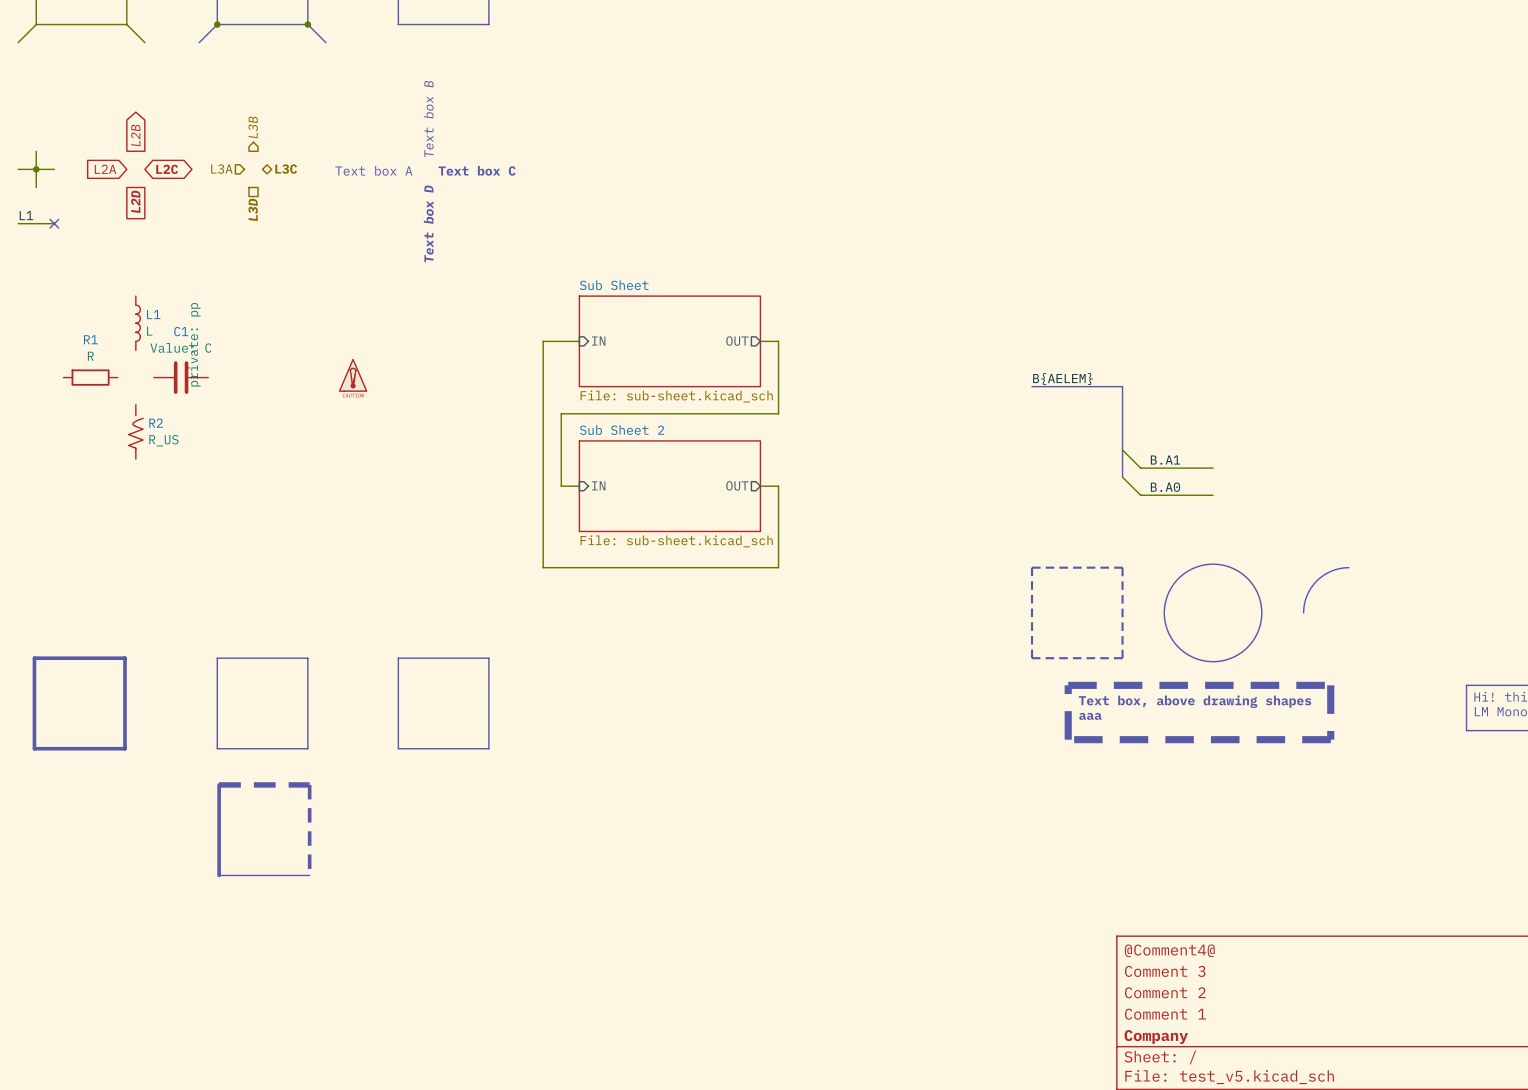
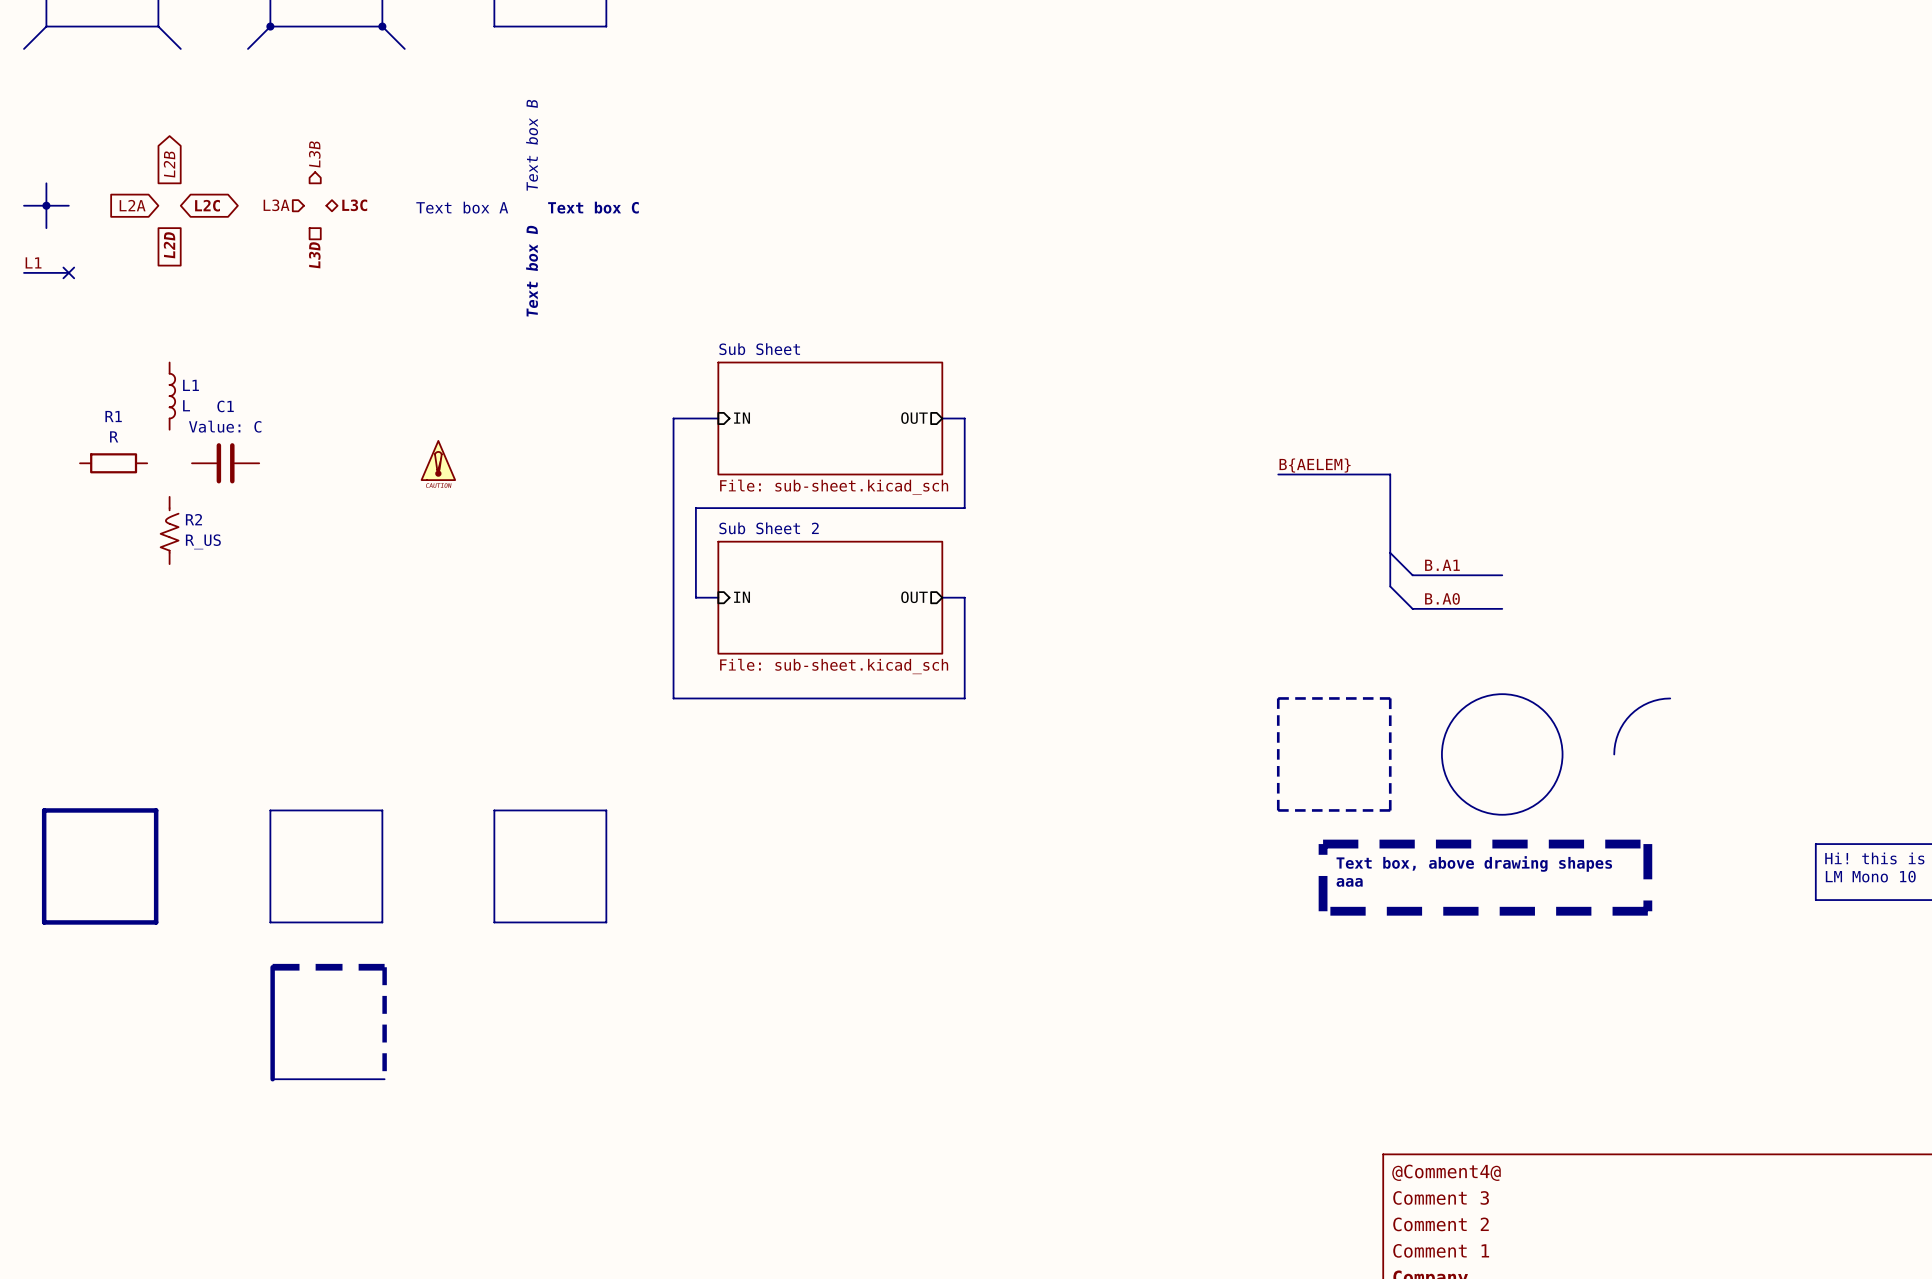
C1 text: private: pp (194, 344) -> none

